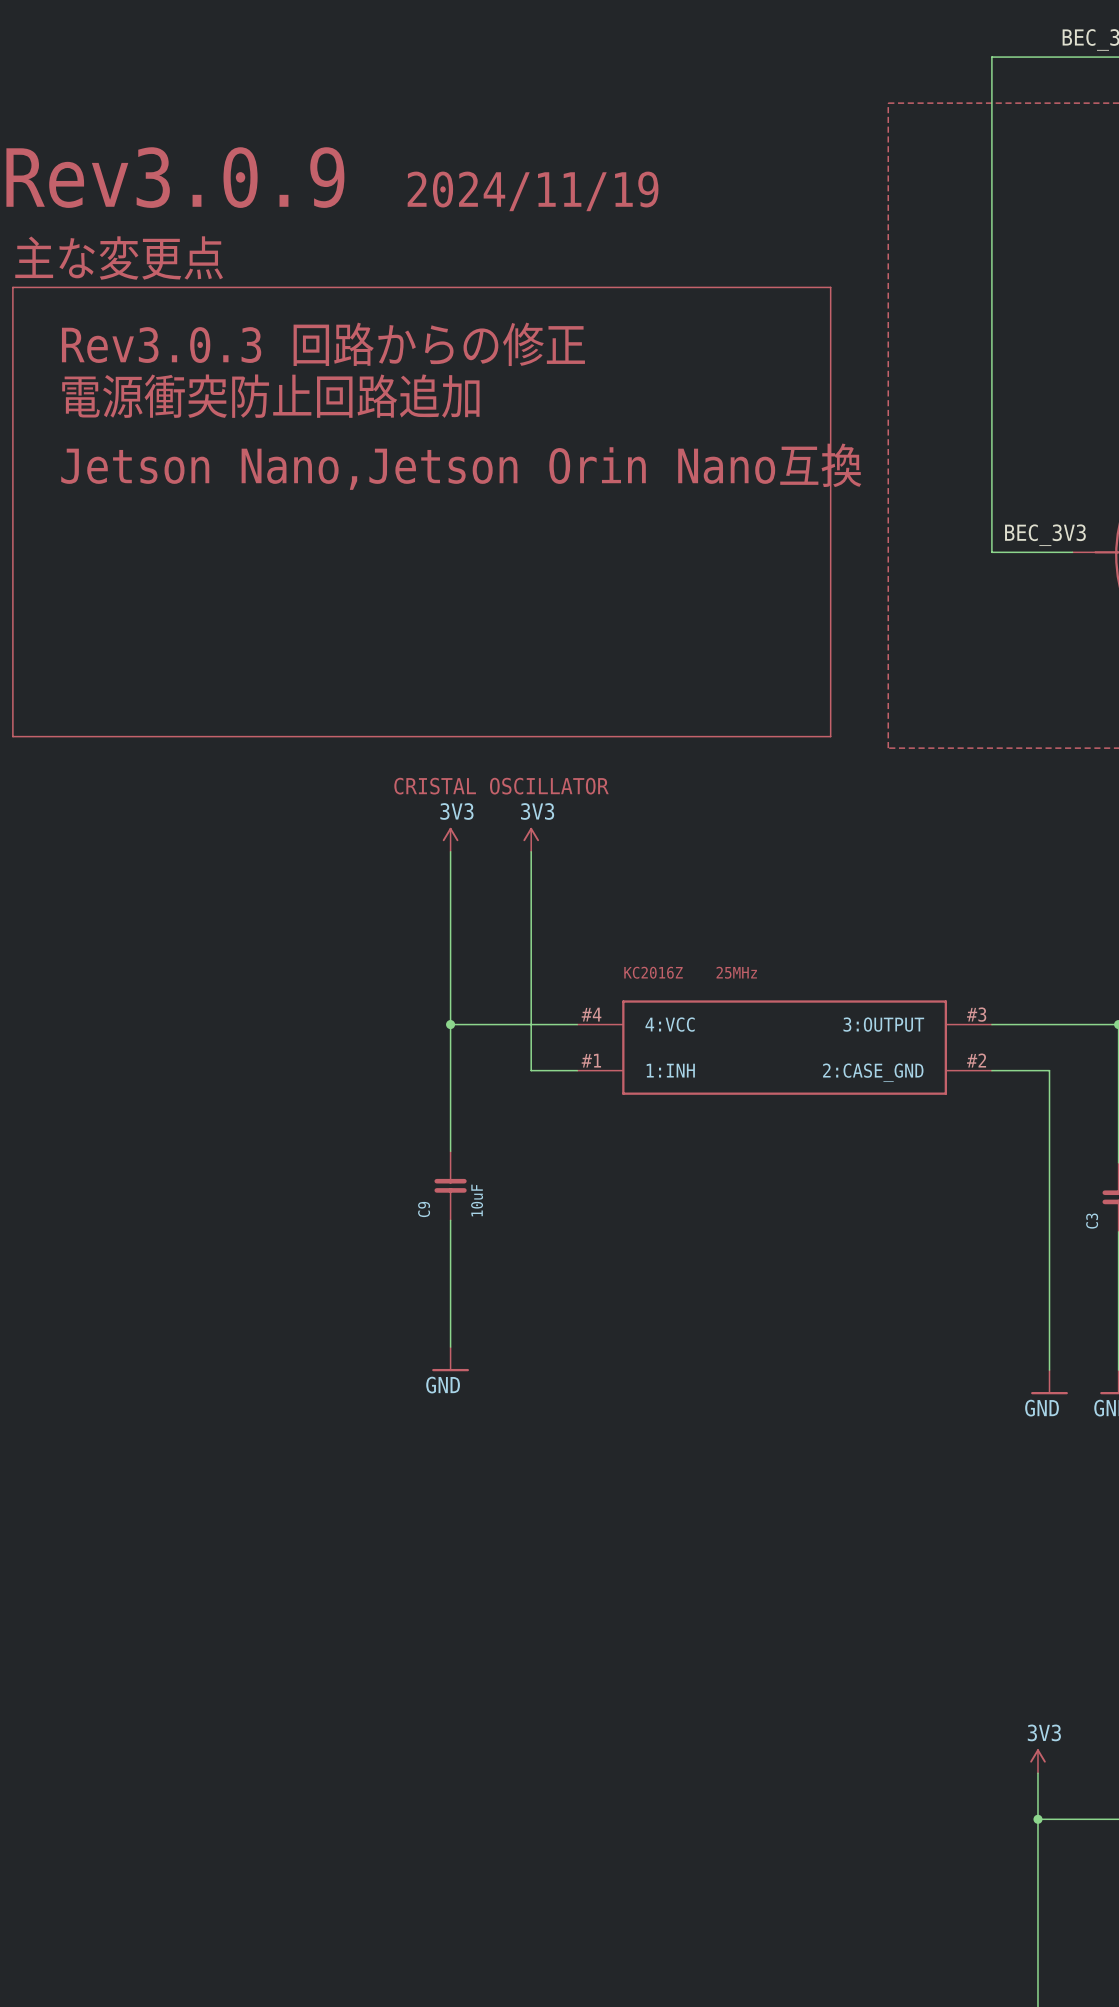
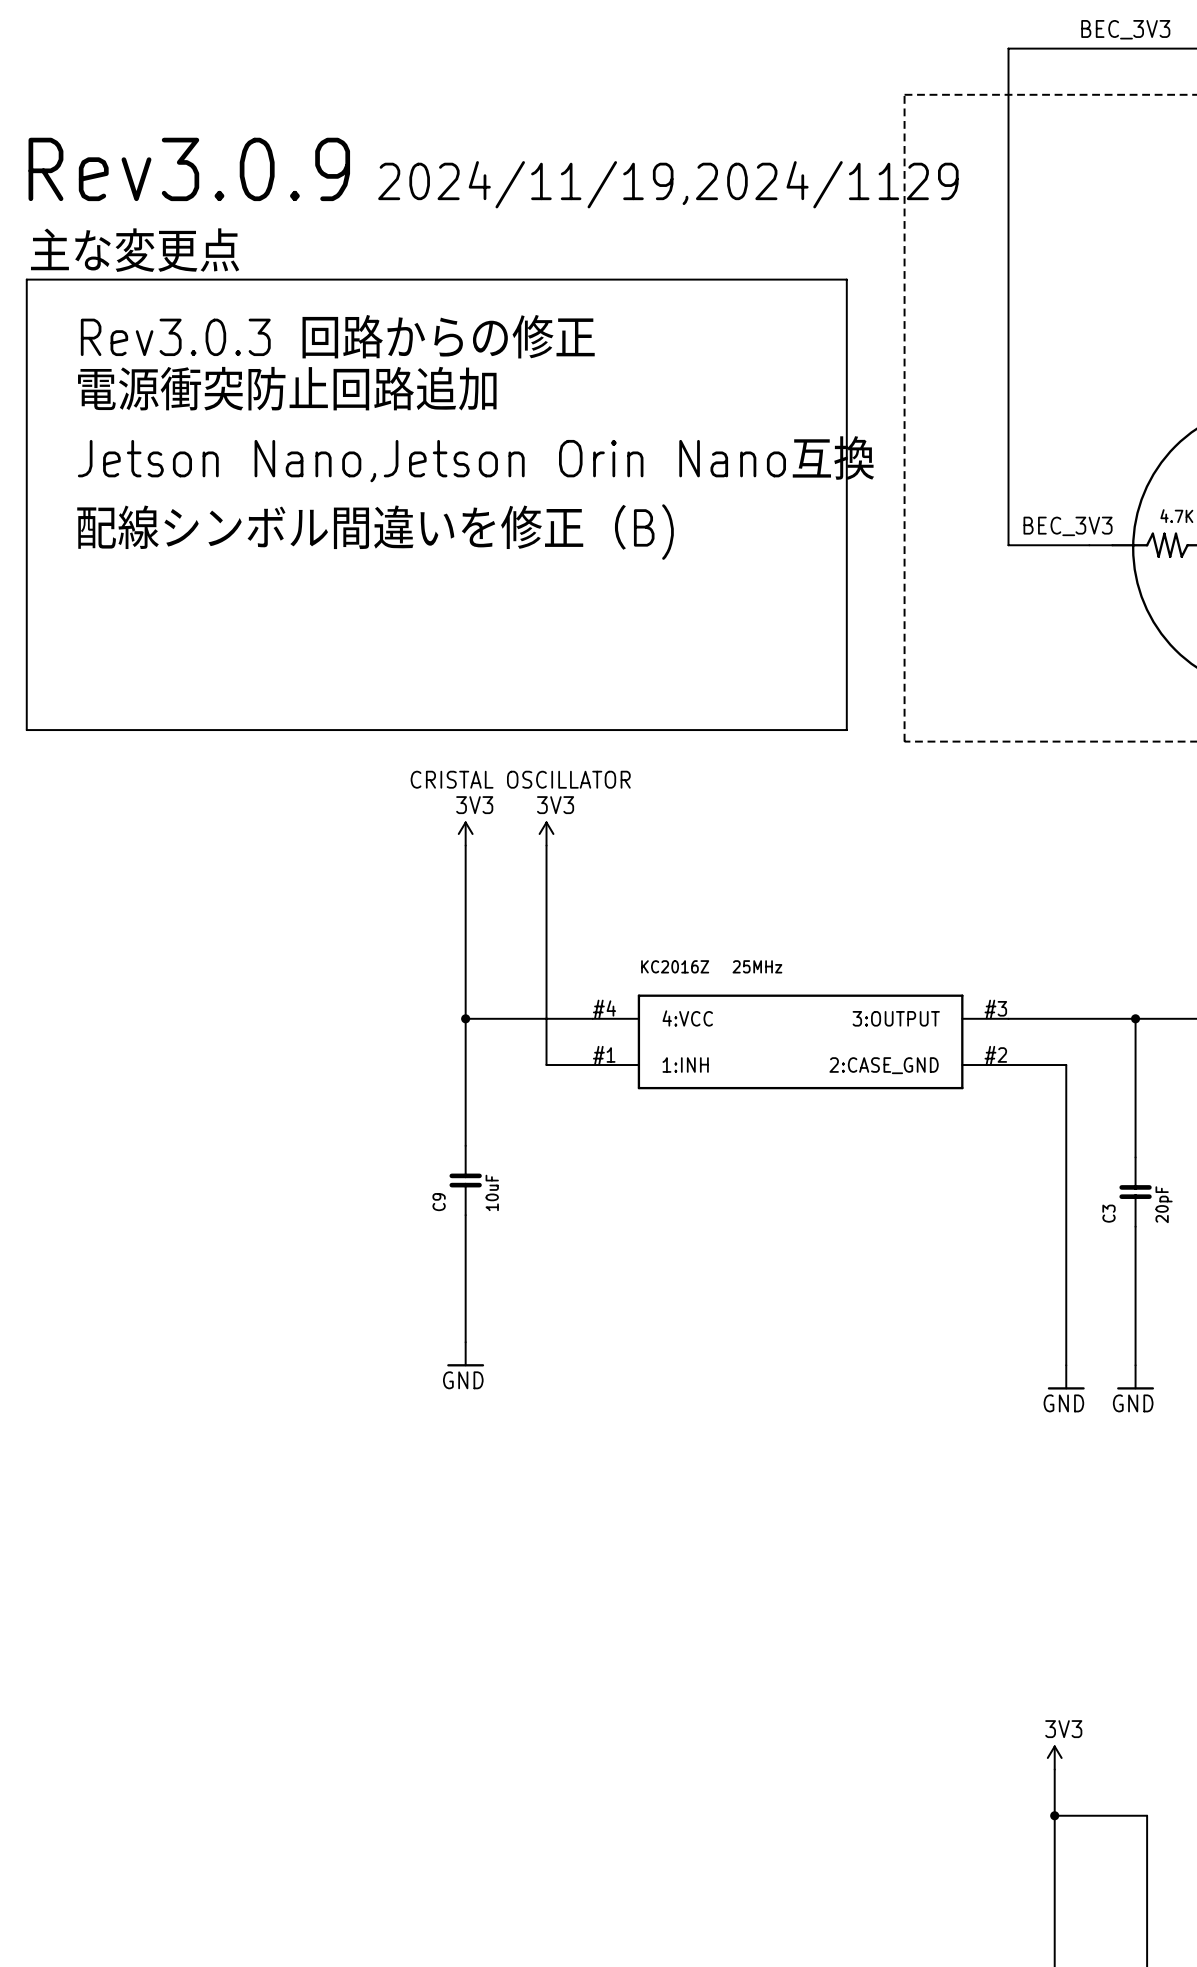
text: 2024/11/19 (533, 191) -> 2024/11/19,2024/1129 (668, 184)
text: none -> 配線シンボル間違いを修正（B) (374, 531)

